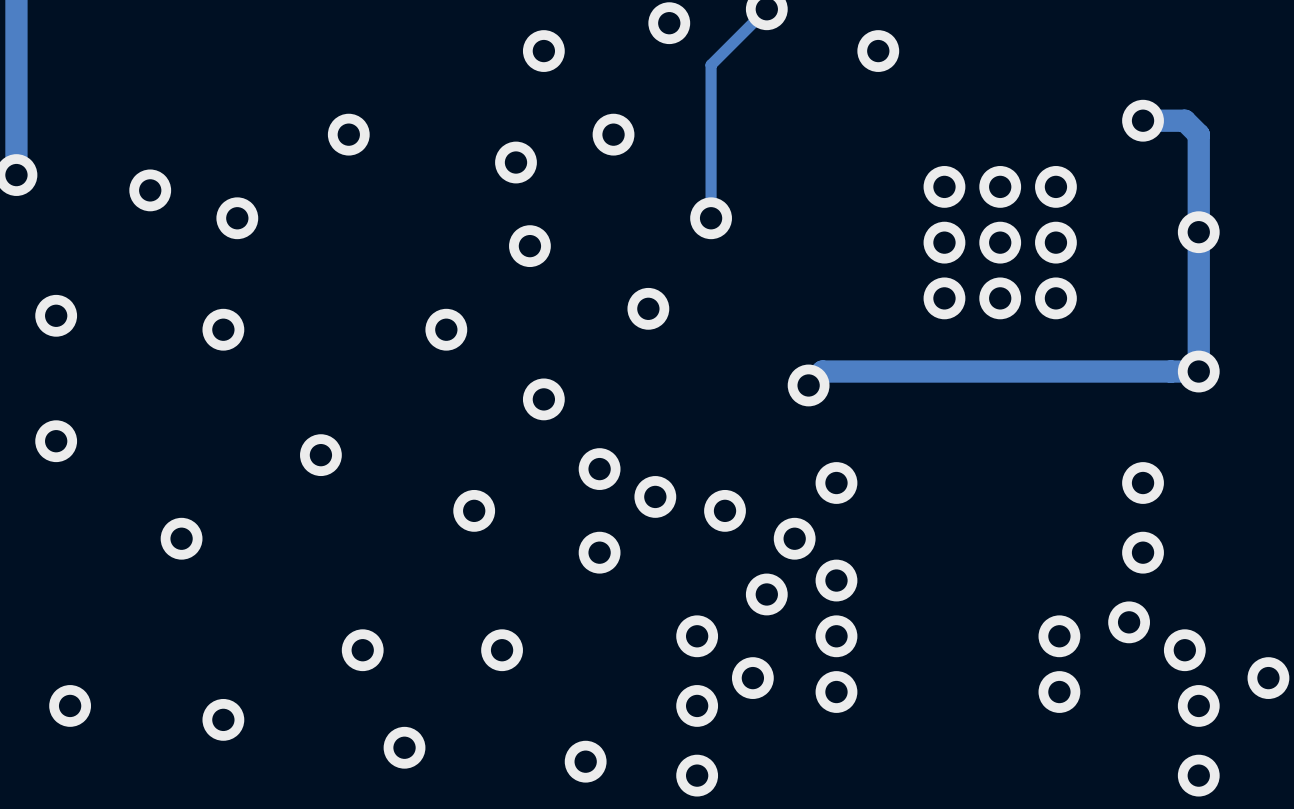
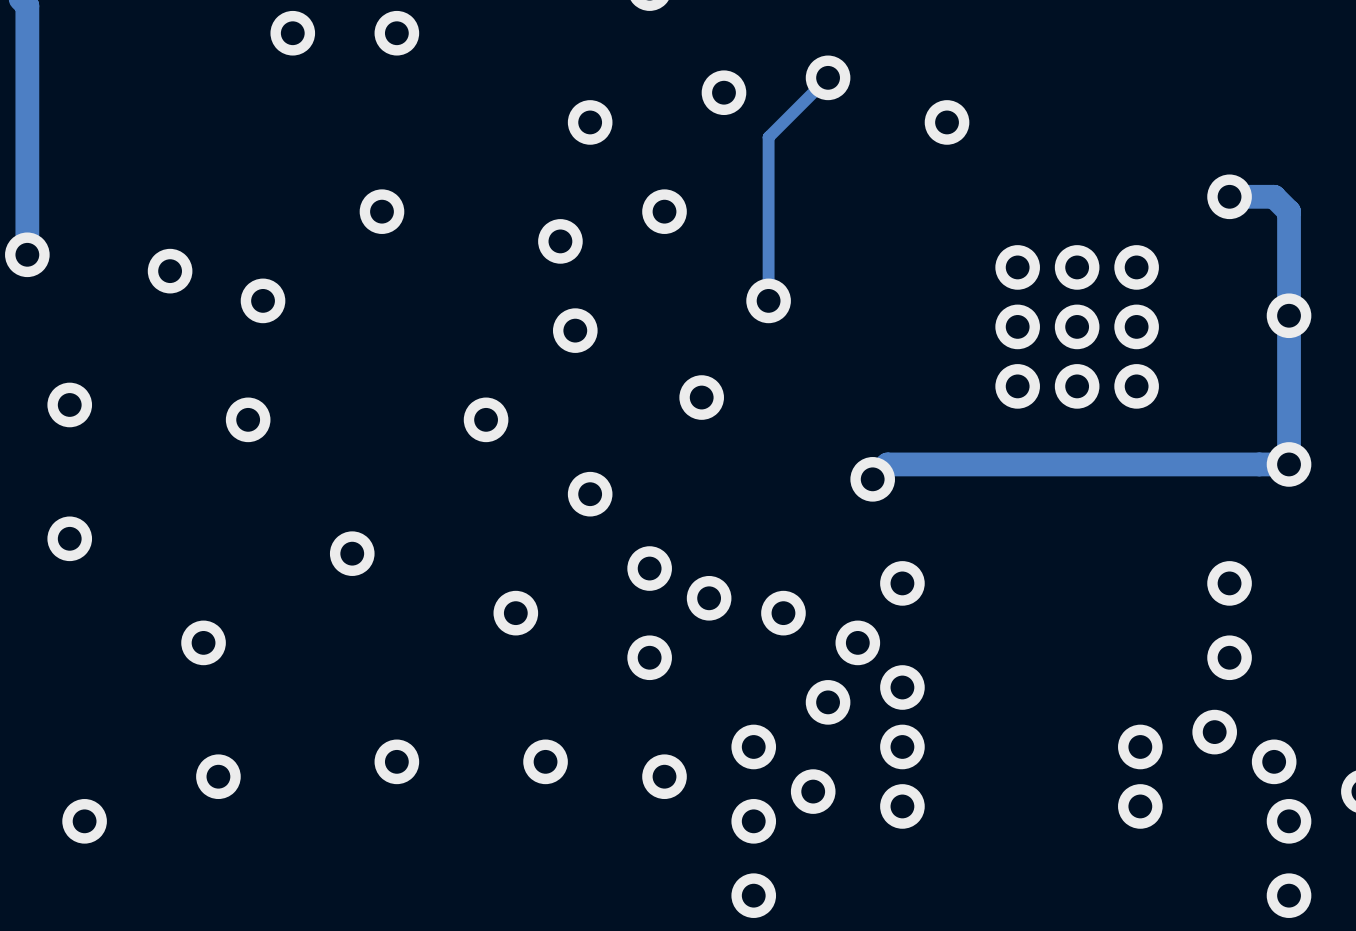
via: none -> (664, 776)
via position: (223, 719) -> (218, 776)
via: (404, 747) -> none
via: (585, 761) -> none

